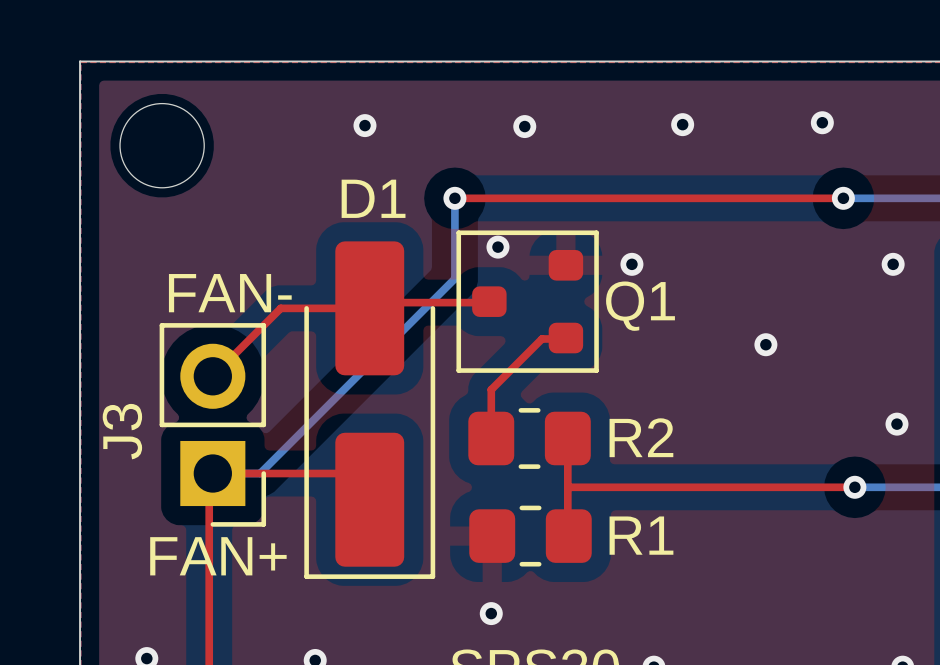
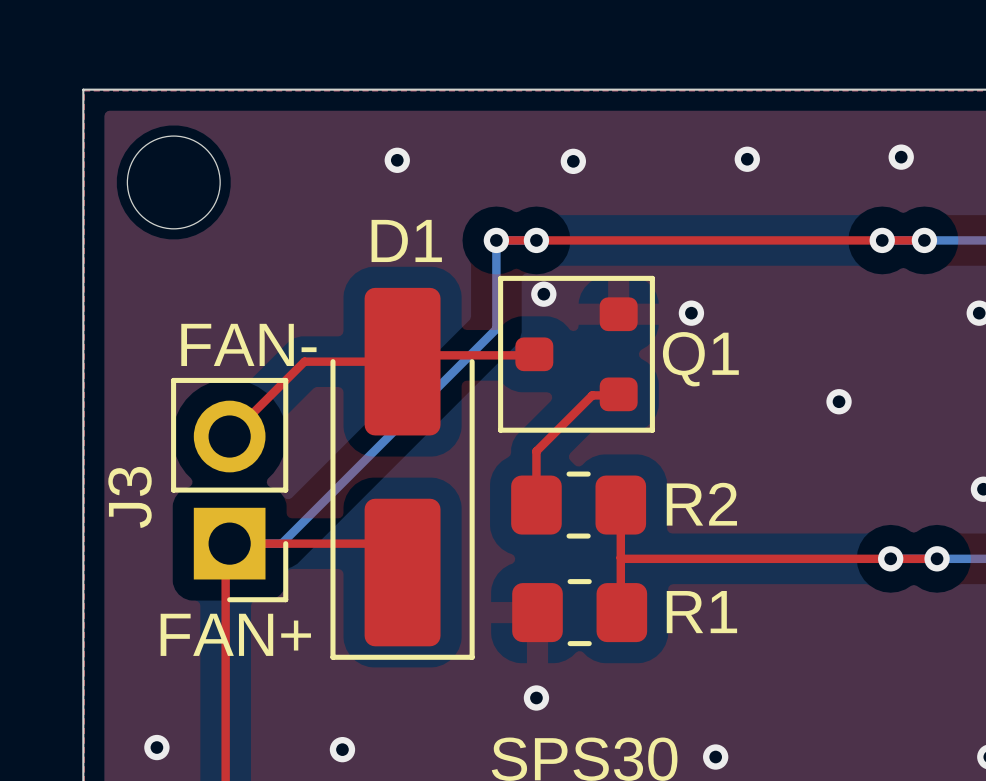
via: none -> (536, 240)
via: none -> (882, 240)
via: none -> (890, 558)

